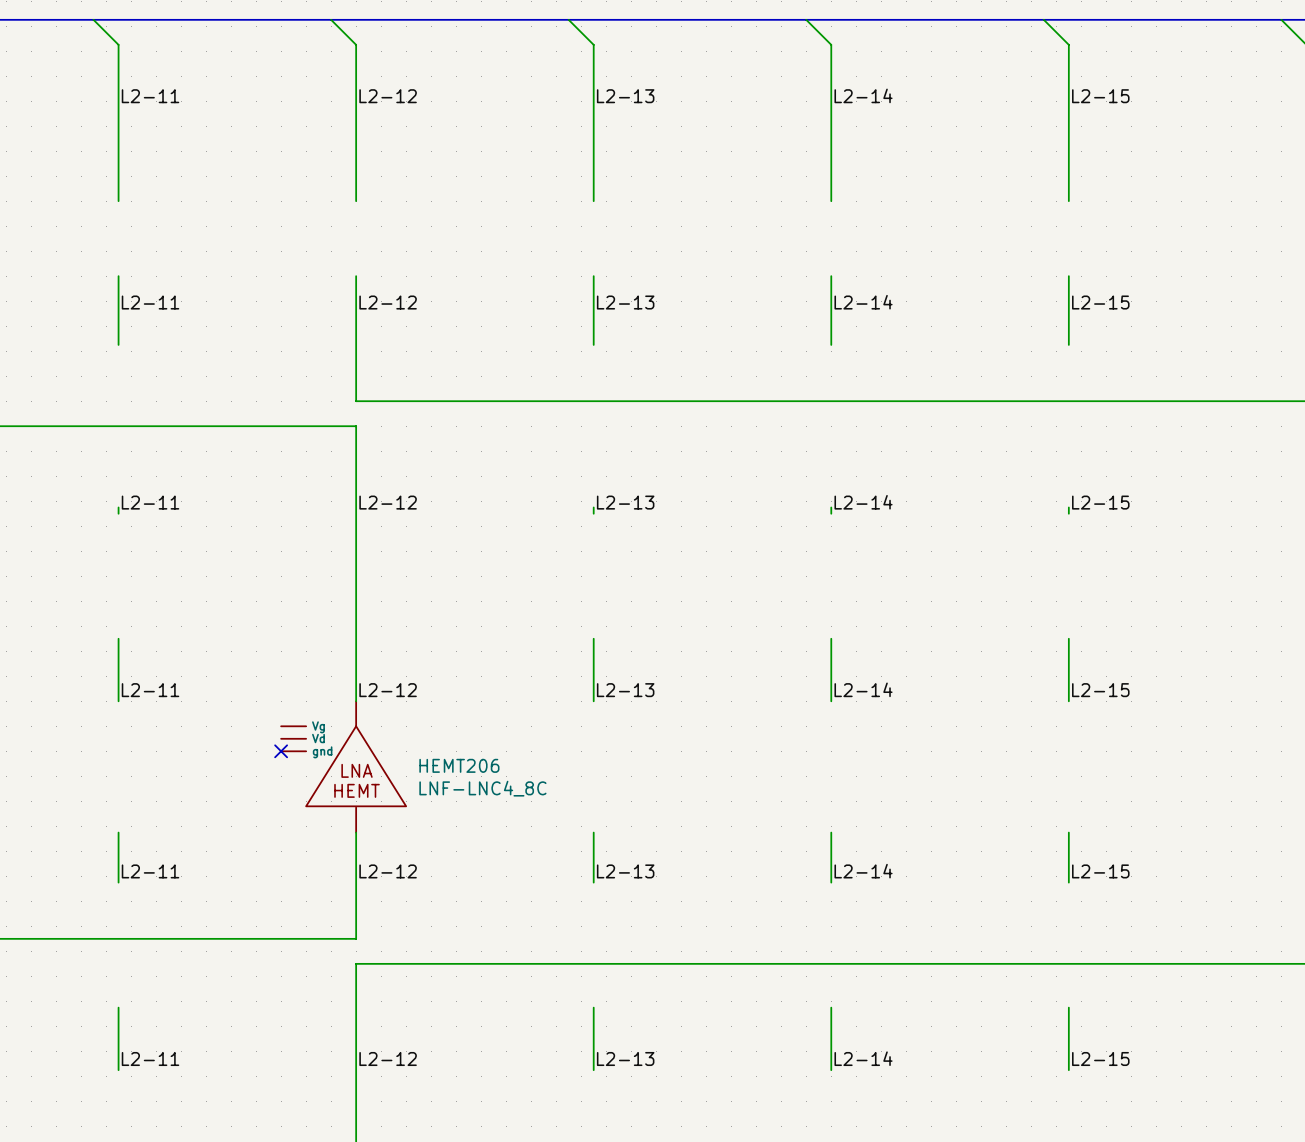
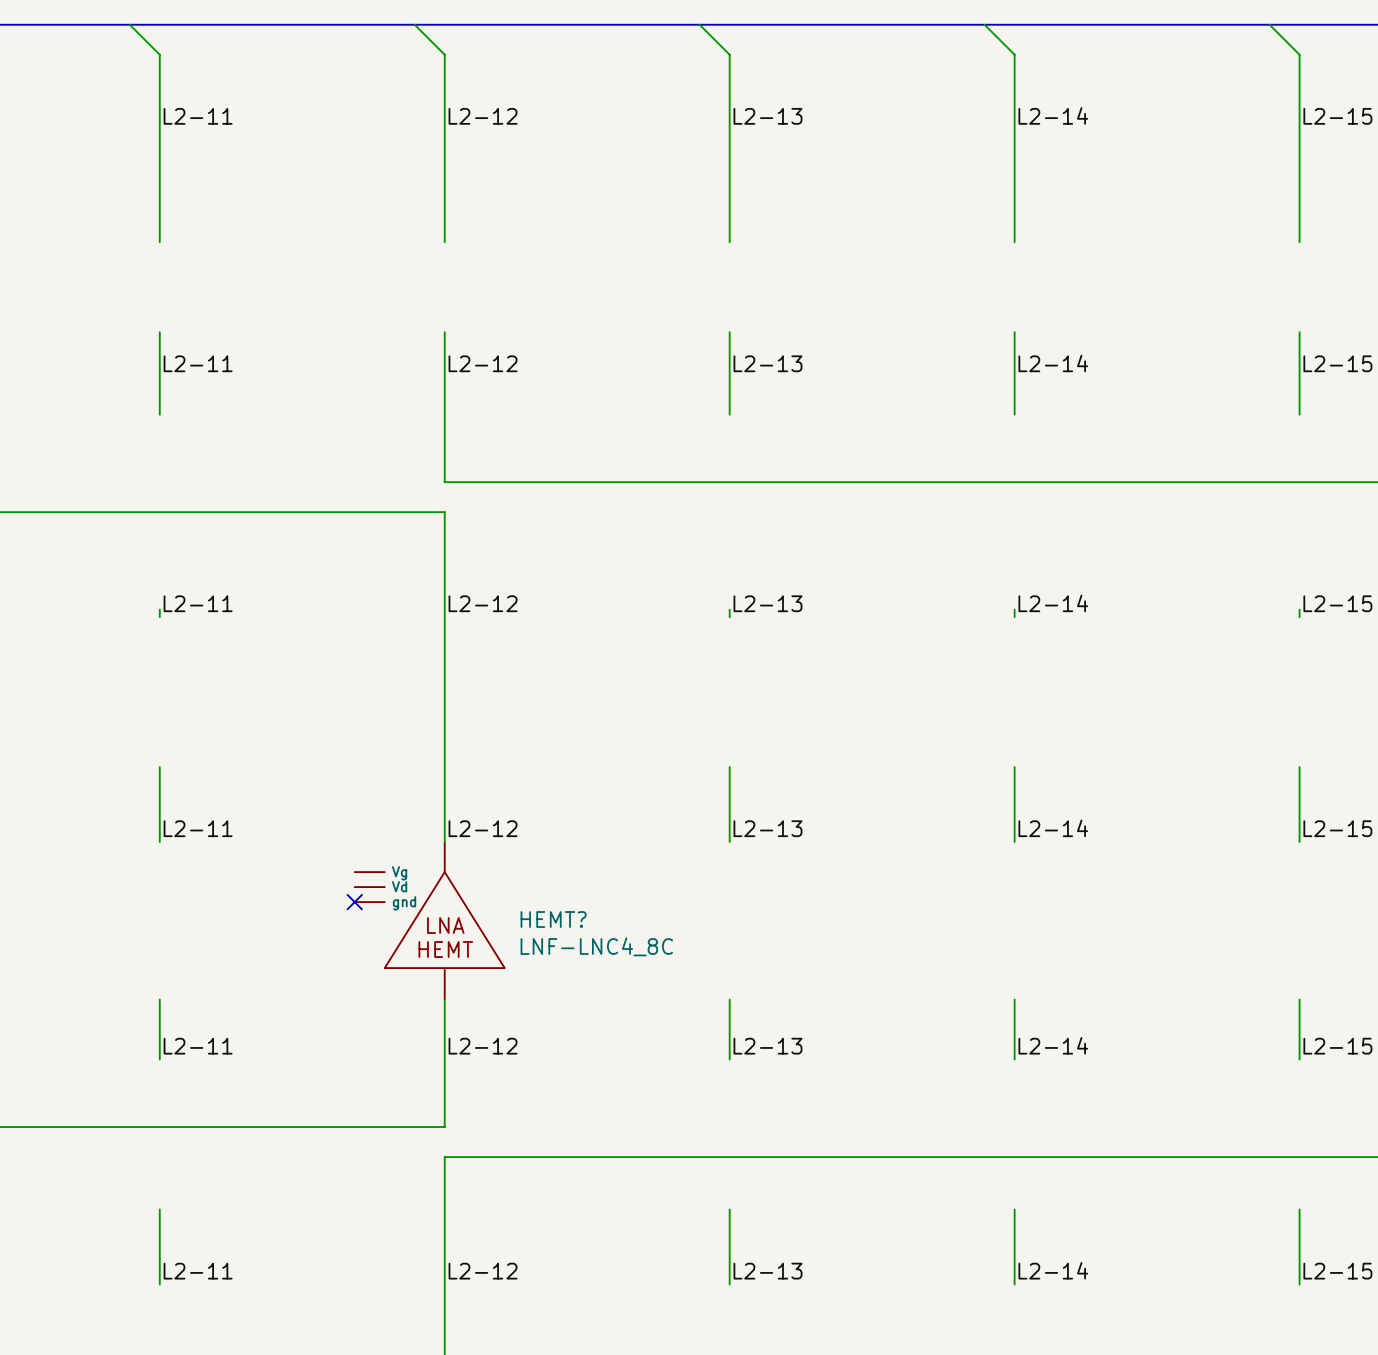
HEMT206 name: HEMT206 (459, 765) -> HEMT? (553, 919)

